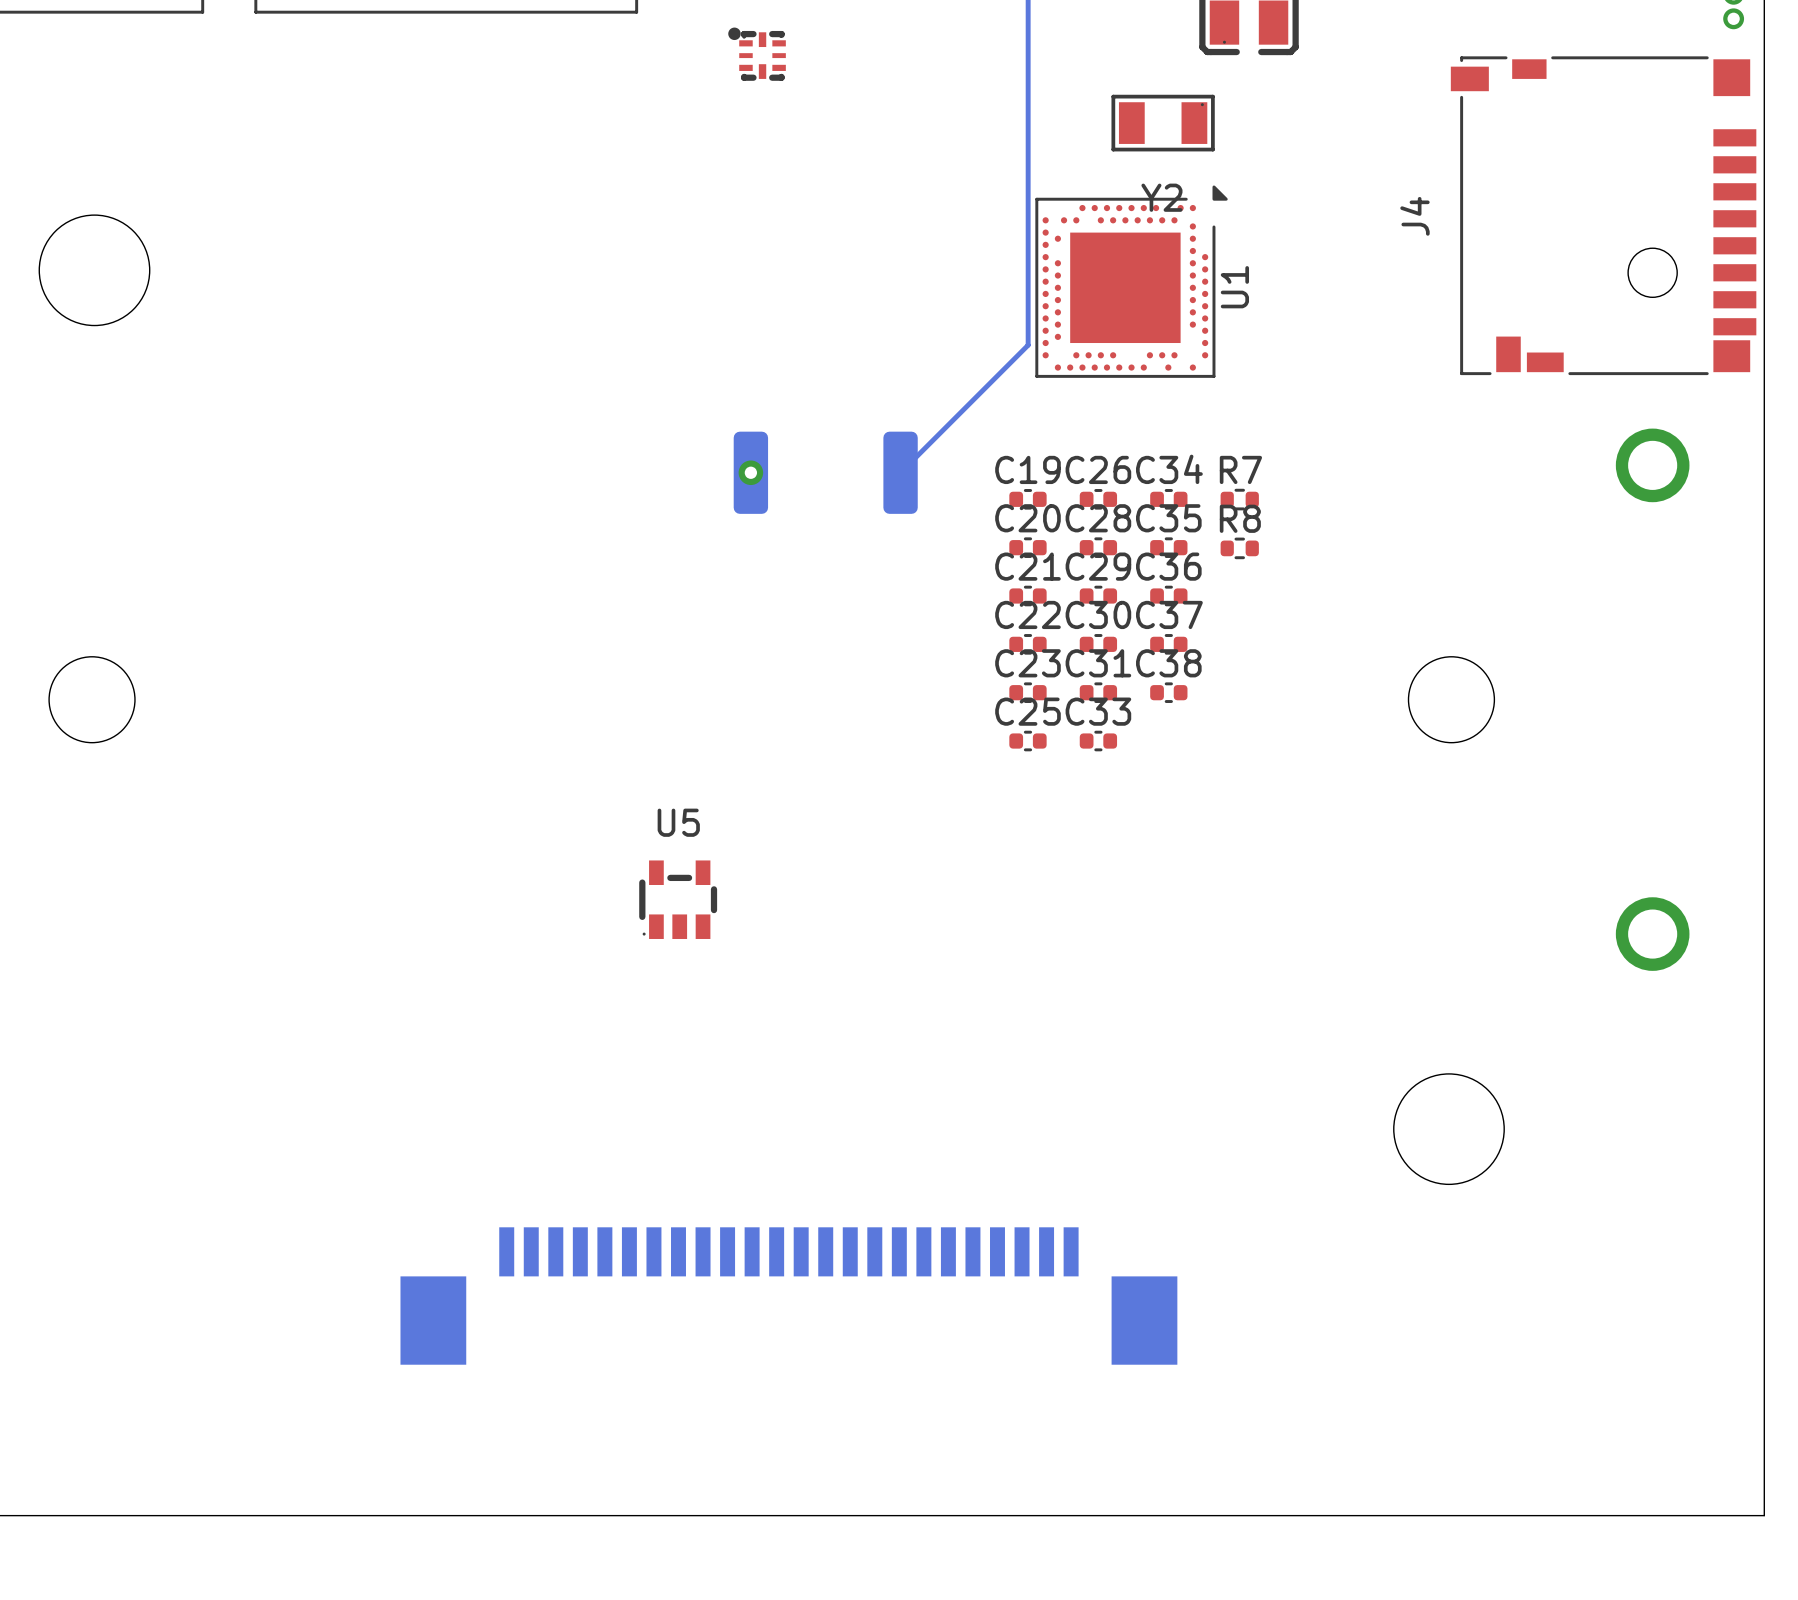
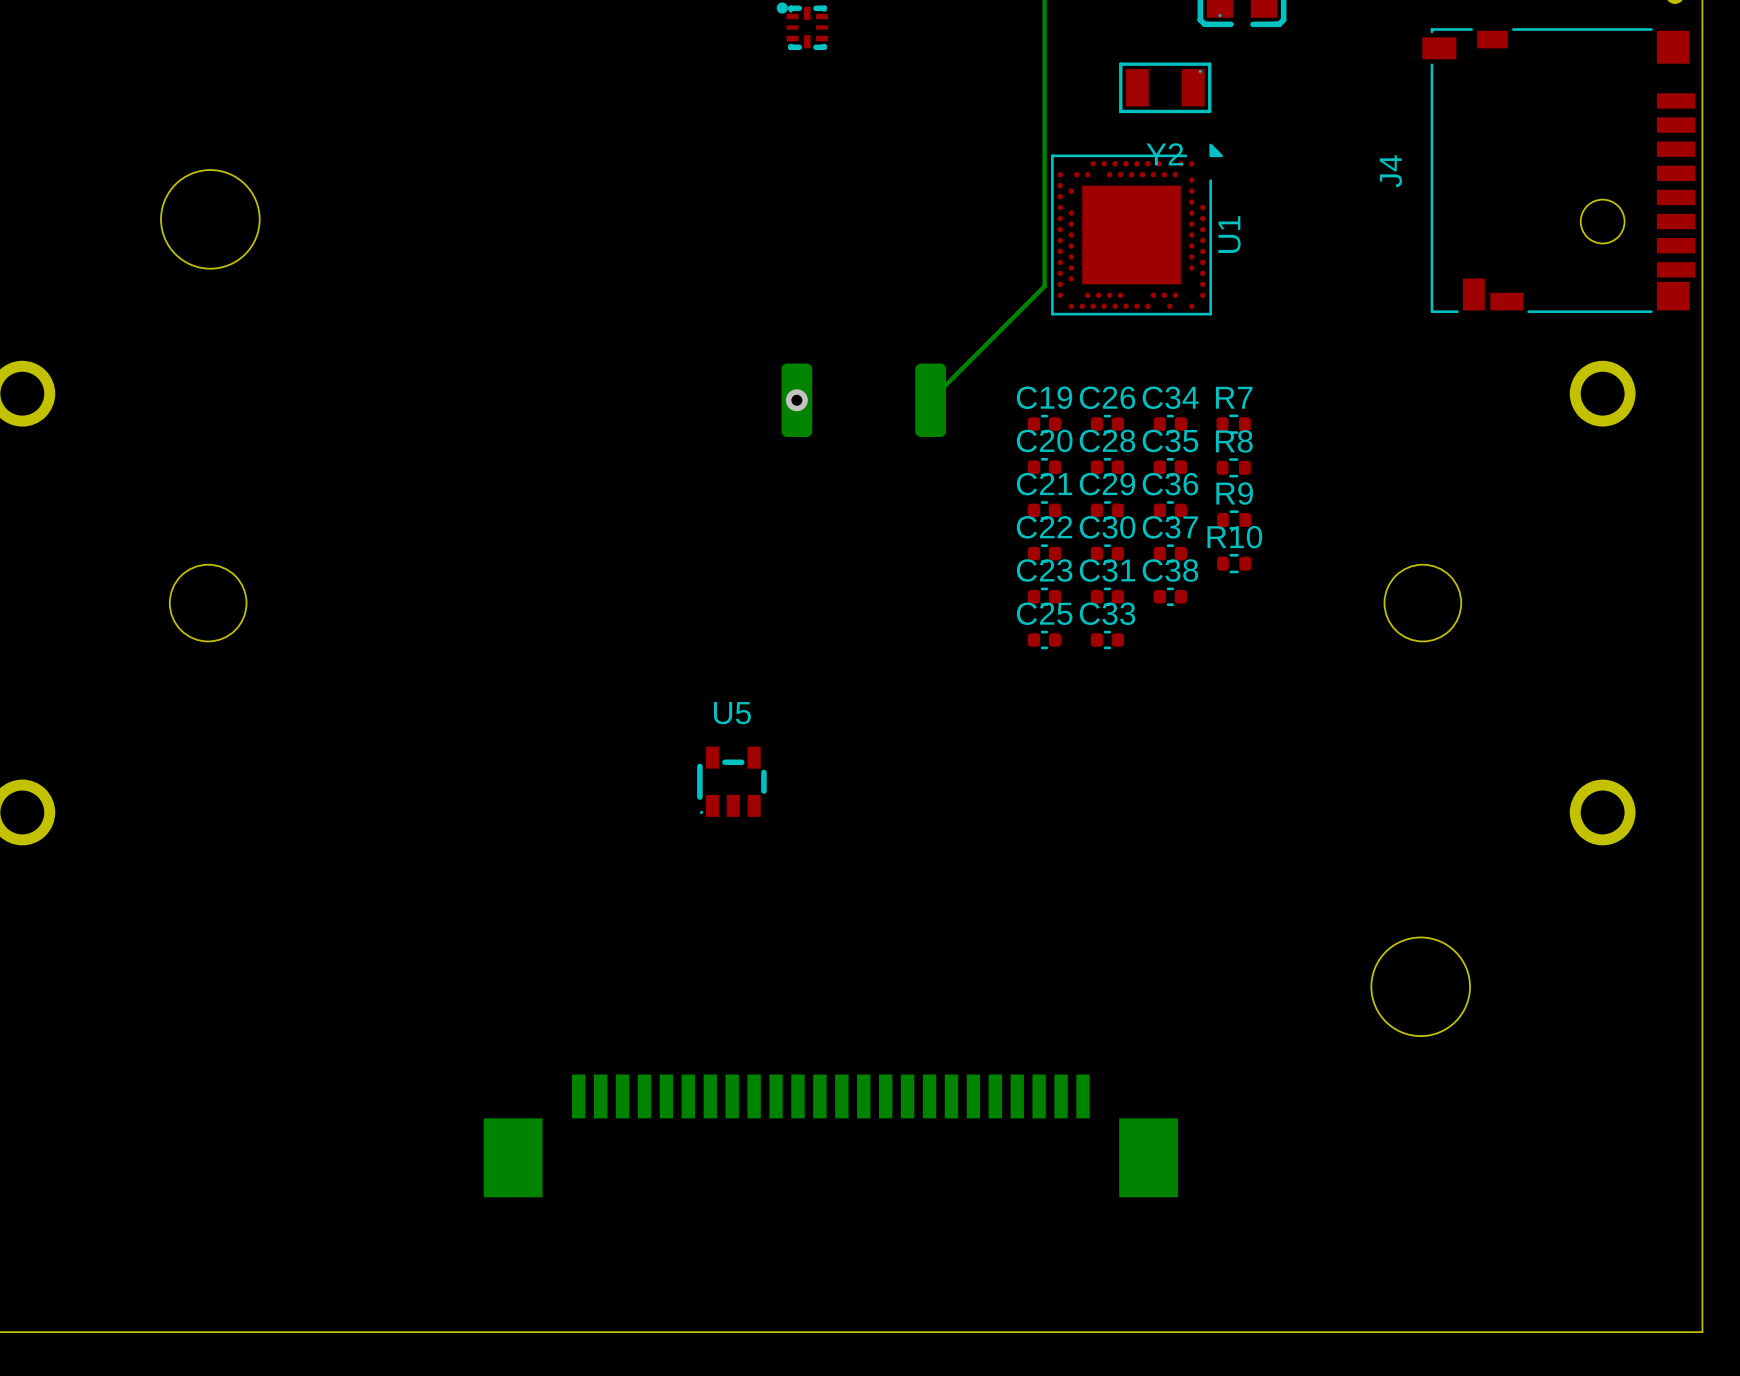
R9: none -> (1234, 519)
R10: none -> (1234, 563)

